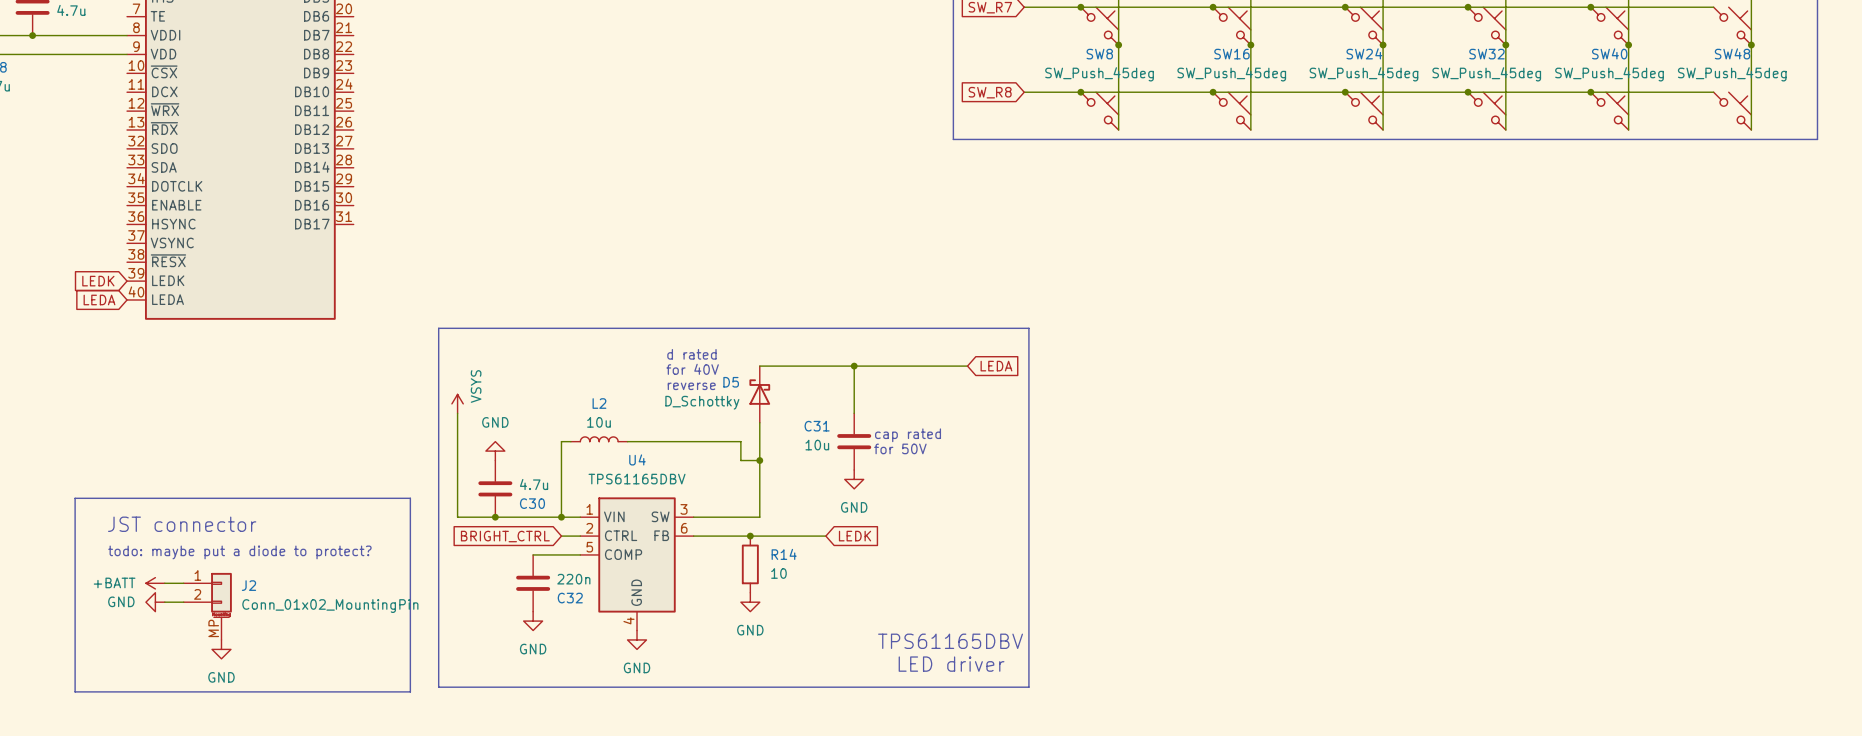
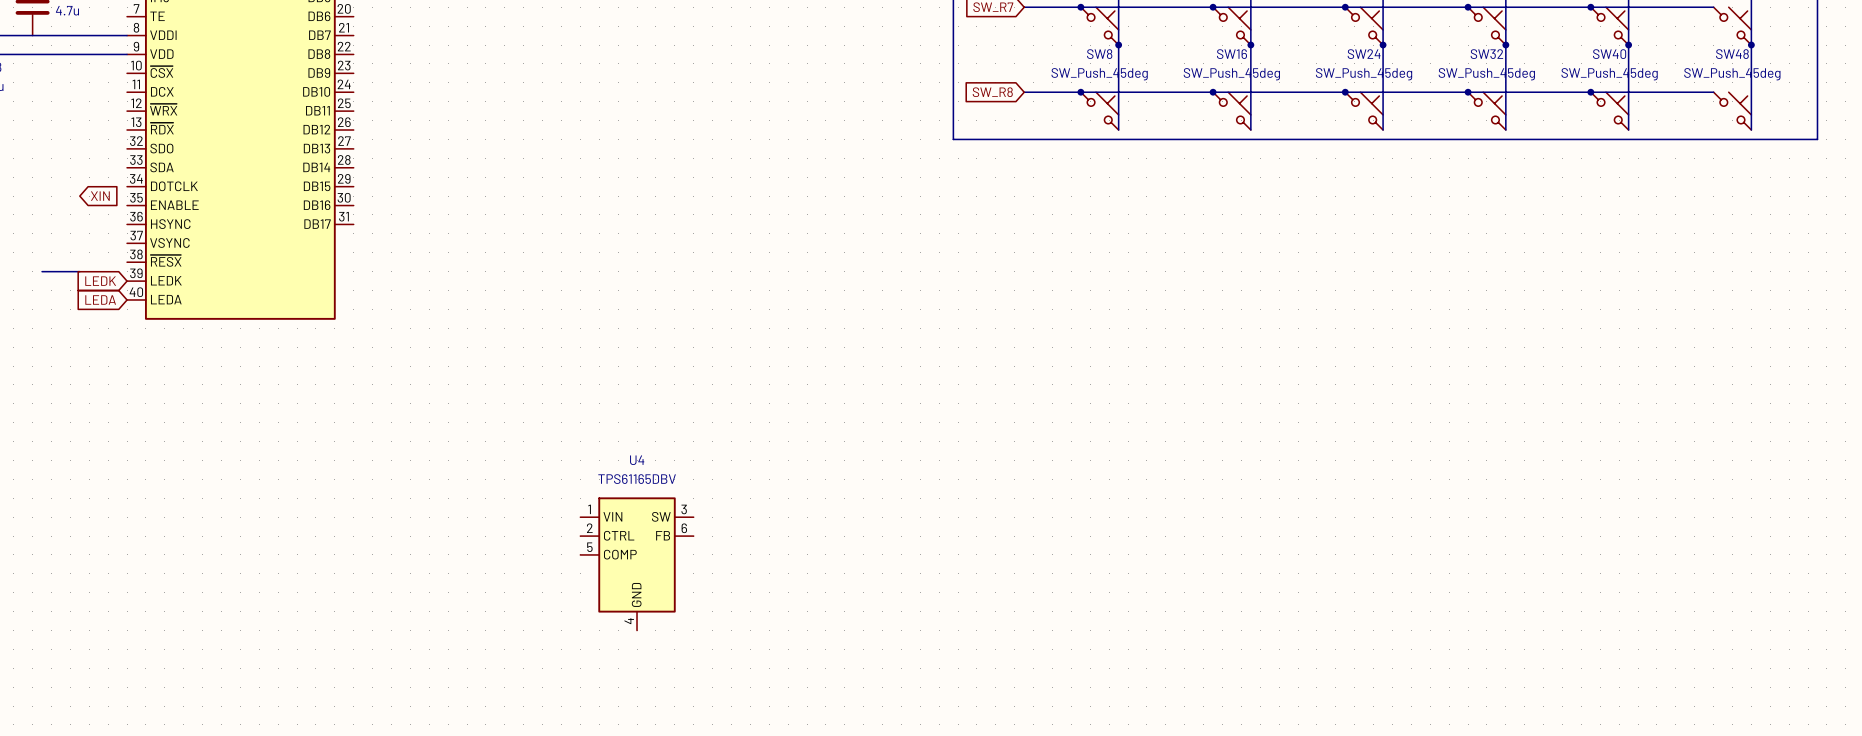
junction: (32, 35) -> none
global label: none -> XIN (100, 196)
wire: none -> (42, 271) (79, 271)
line: (438, 328) (1028, 328) (1028, 687) (438, 687) (438, 328) -> none
text: d rated (691, 354) -> none
wire: (759, 366) (967, 366) -> none
wire: (854, 366) (854, 413) -> none
junction: (854, 366) -> none
global label: LEDA (996, 366) -> none
text: for 40V (692, 369) -> none
text: reverse (691, 386) -> none
D5: D_Schottky (759, 394) -> none
power symbol: VSYS (457, 403) -> none
wire: (457, 413) (457, 517) (580, 517) -> none
wire: (759, 422) (759, 517) (693, 517) -> none
text: cap rated (908, 435) -> none
L2: 10u (599, 439) -> none
wire: (570, 441) (561, 441) (561, 517) -> none
wire: (627, 441) (740, 441) (740, 460) (759, 460) -> none
C31: 10u (854, 441) -> none
text: for 50V (900, 448) -> none
power symbol: GND (495, 451) -> none
junction: (759, 460) -> none
power symbol: GND (854, 479) -> none
C30: 4.7u (495, 488) -> none
line: (75, 498) (410, 498) (410, 691) (75, 691) (75, 498) -> none
junction: (495, 517) -> none
junction: (561, 517) -> none
text: JST connector (182, 524) -> none
global label: BRIGHT_CTRL (505, 536) -> none
wire: (561, 536) (580, 536) -> none
wire: (693, 536) (825, 536) -> none
junction: (750, 536) -> none
global label: LEDK (855, 536) -> none
text: todo: maybe put a diode to protect? (239, 552) -> none
wire: (533, 554) (580, 554) -> none
R14: 10 (750, 564) -> none
power symbol: +BATT (155, 583) -> none
wire: (164, 583) (183, 583) -> none
C32: 220n (533, 583) -> none
power symbol: GND (155, 602) -> none
wire: (164, 602) (183, 602) -> none
power symbol: GND (750, 602) -> none
J2: Conn_01x02_MountingPin (207, 606) -> none
power symbol: GND (533, 621) -> none
power symbol: GND (637, 639) -> none
text: TPS61165DBV (950, 641) -> none
power symbol: GND (221, 649) -> none
text: LED driver (951, 664) -> none

